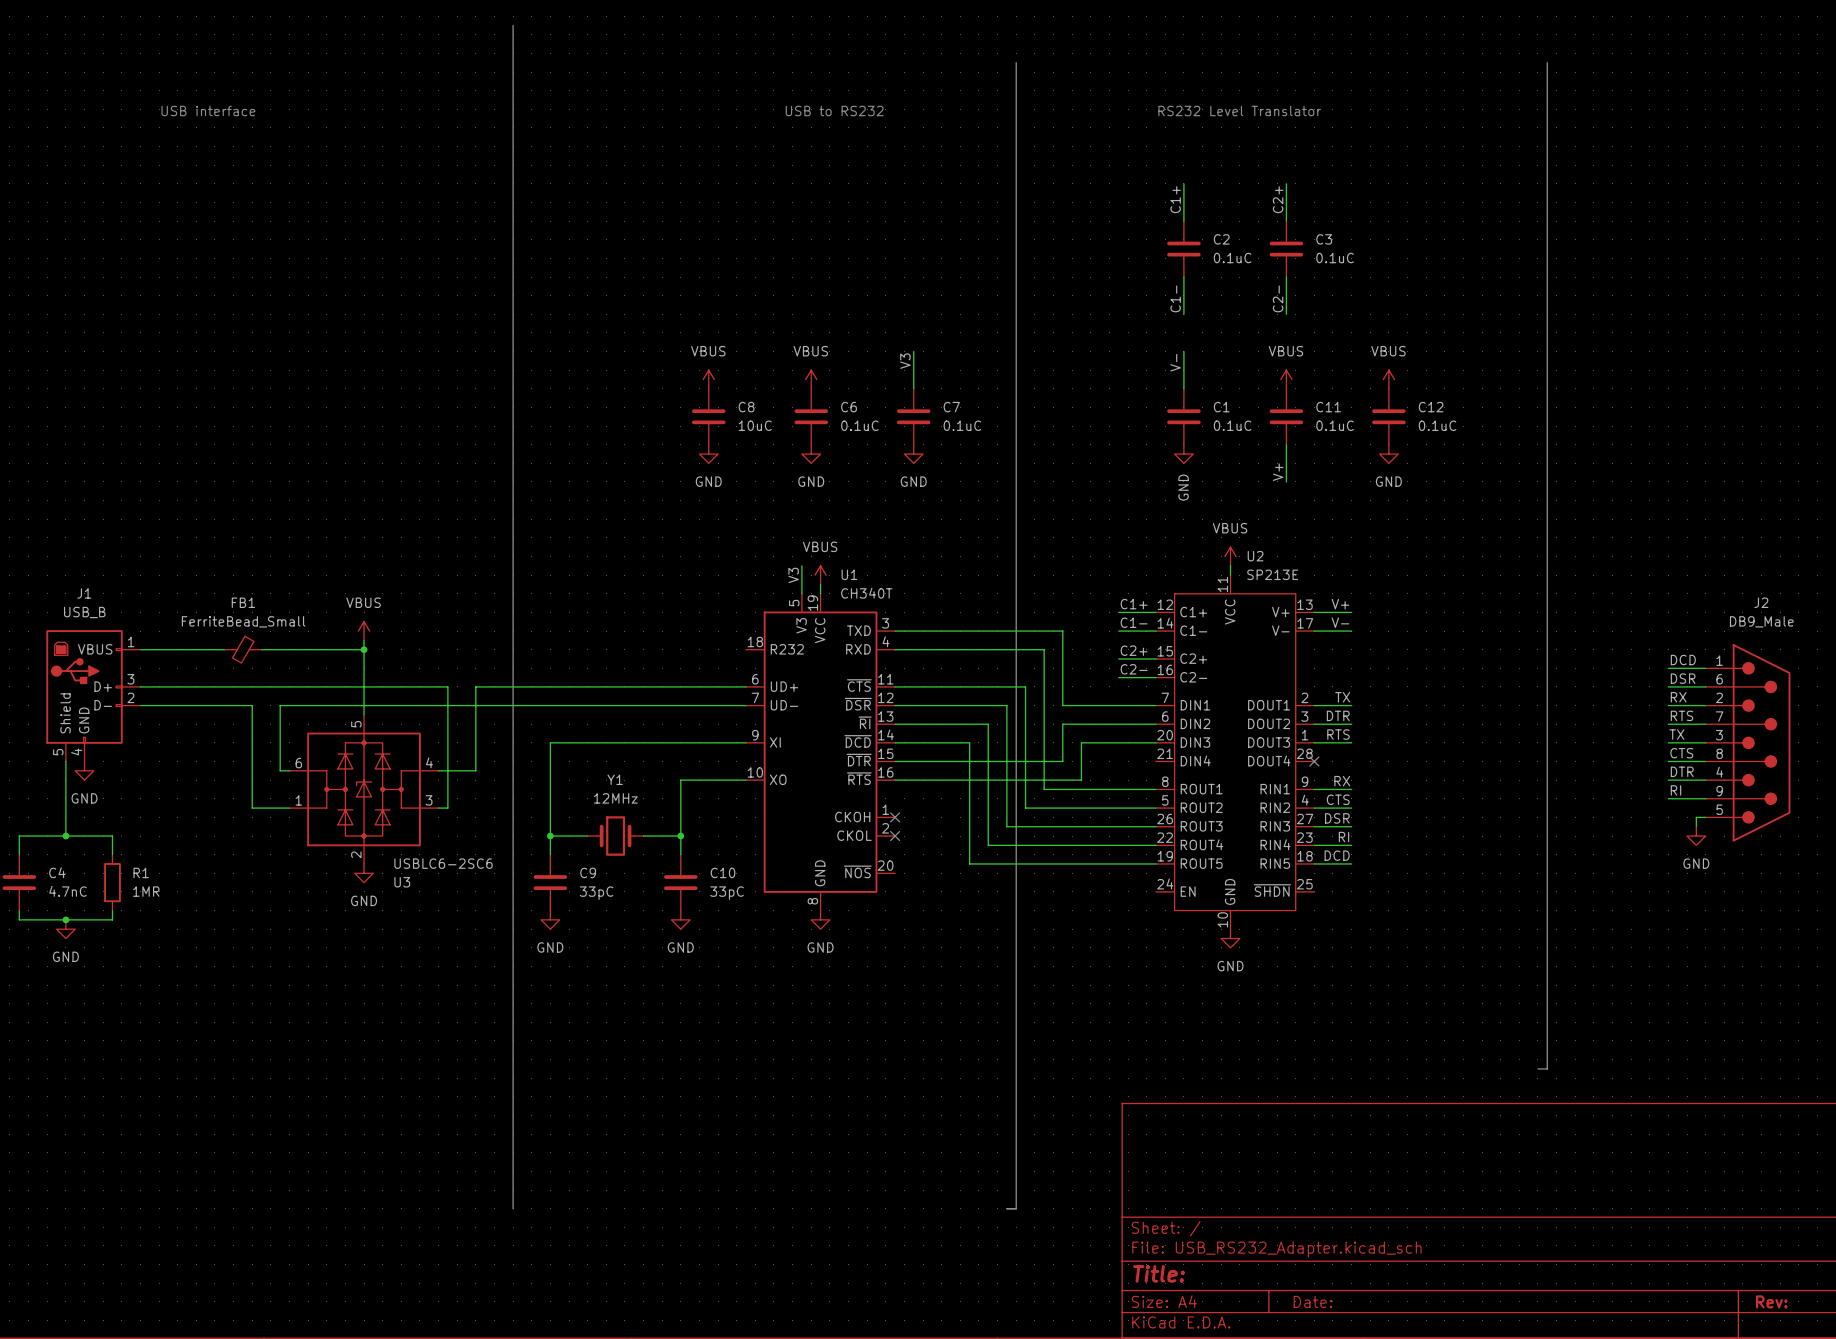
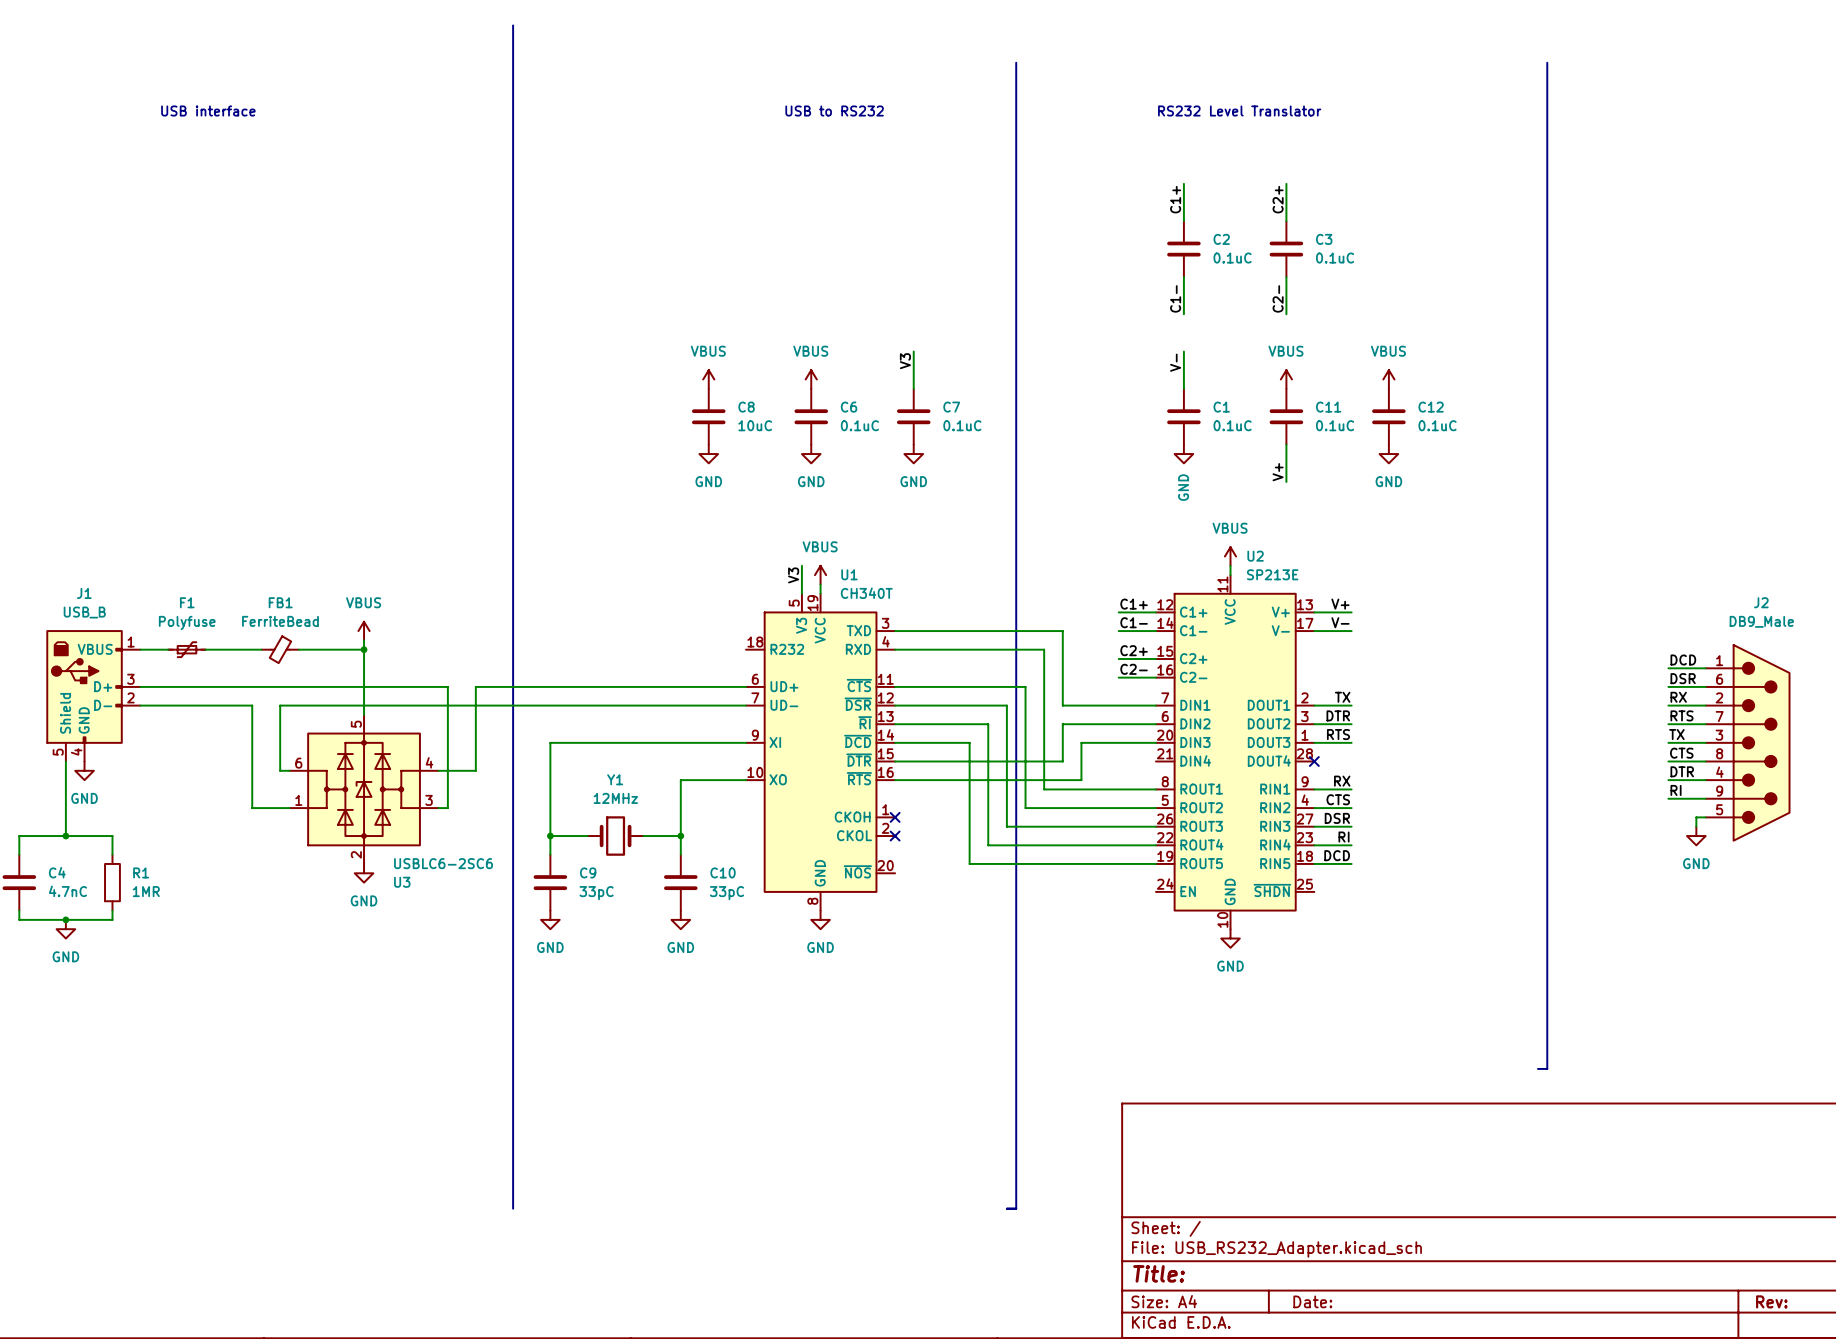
FB1 value: FerriteBead_Small (243, 621) -> FerriteBead (280, 621)
F1: none -> Polyfuse (187, 649)
FB1 position: (242, 649) -> (280, 649)

